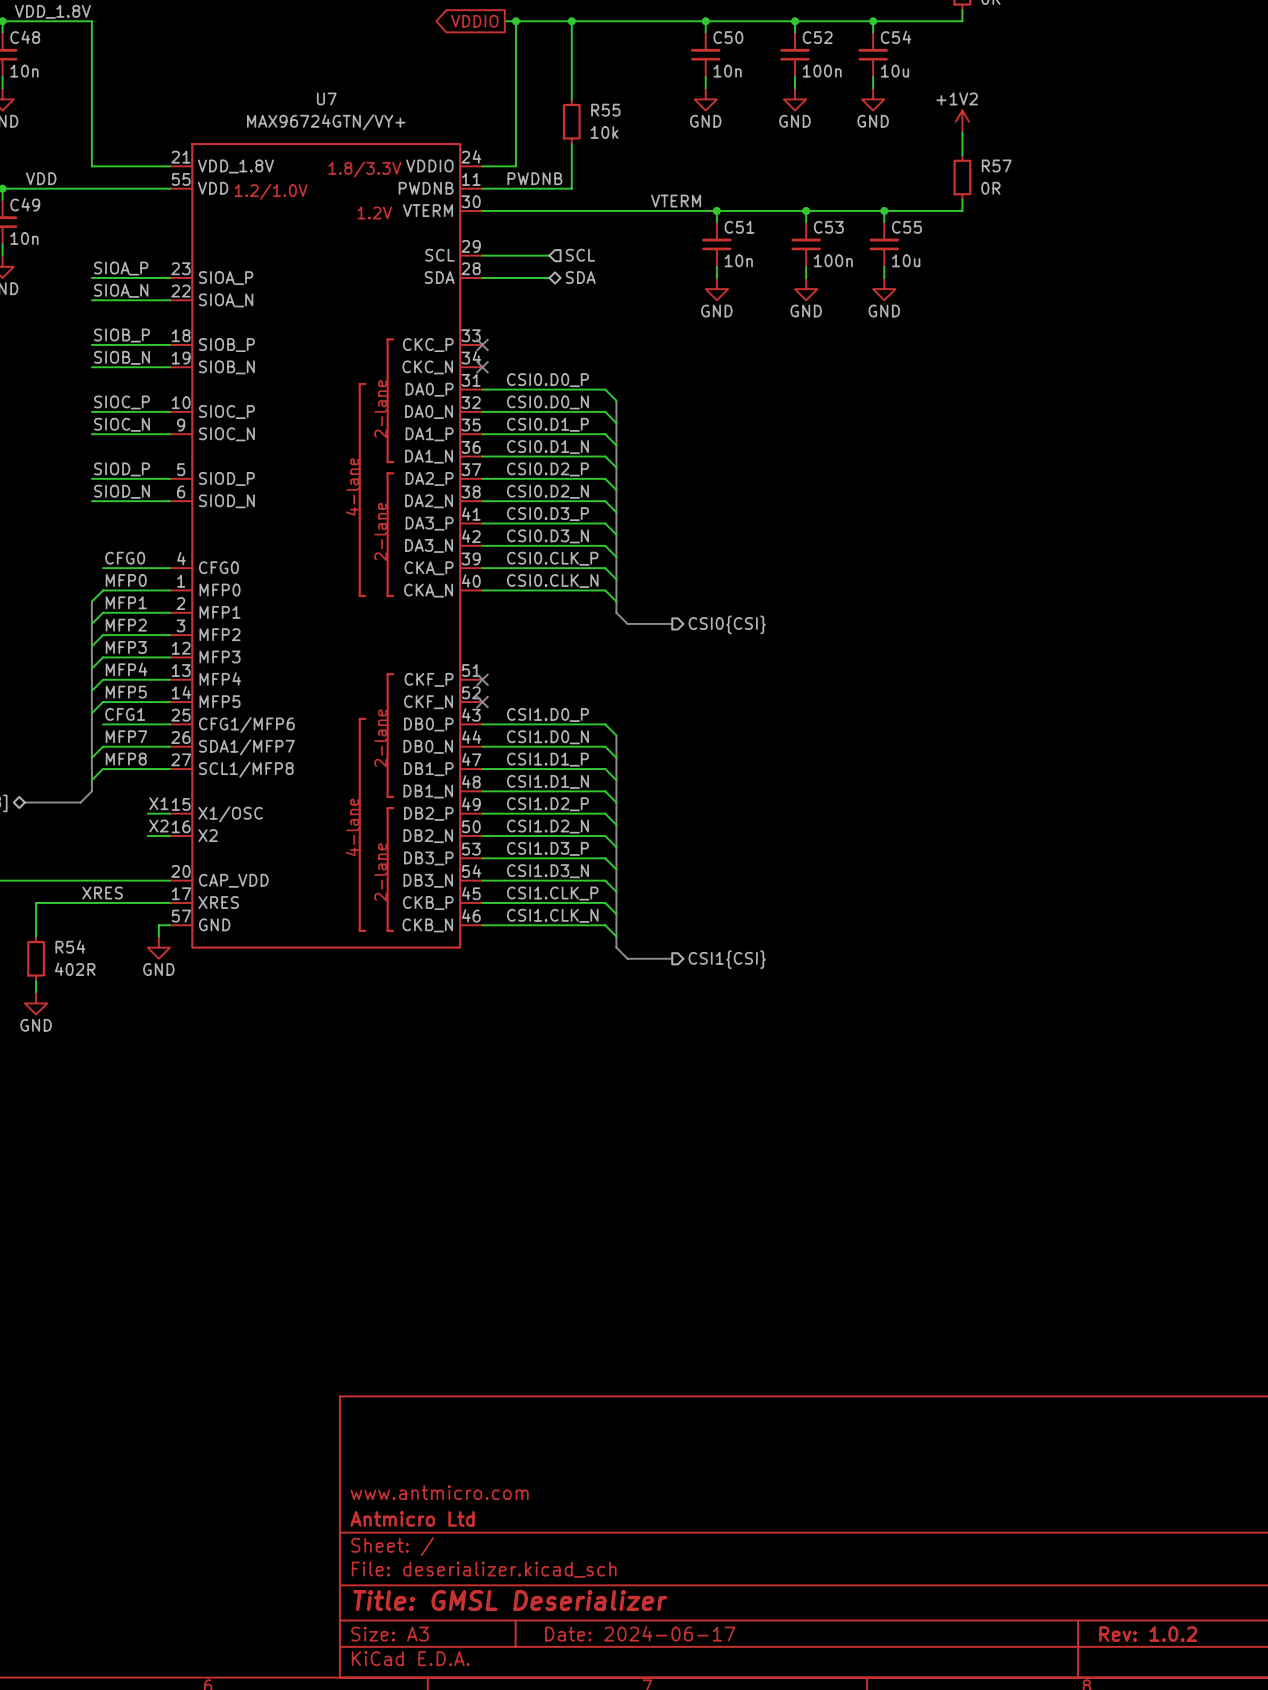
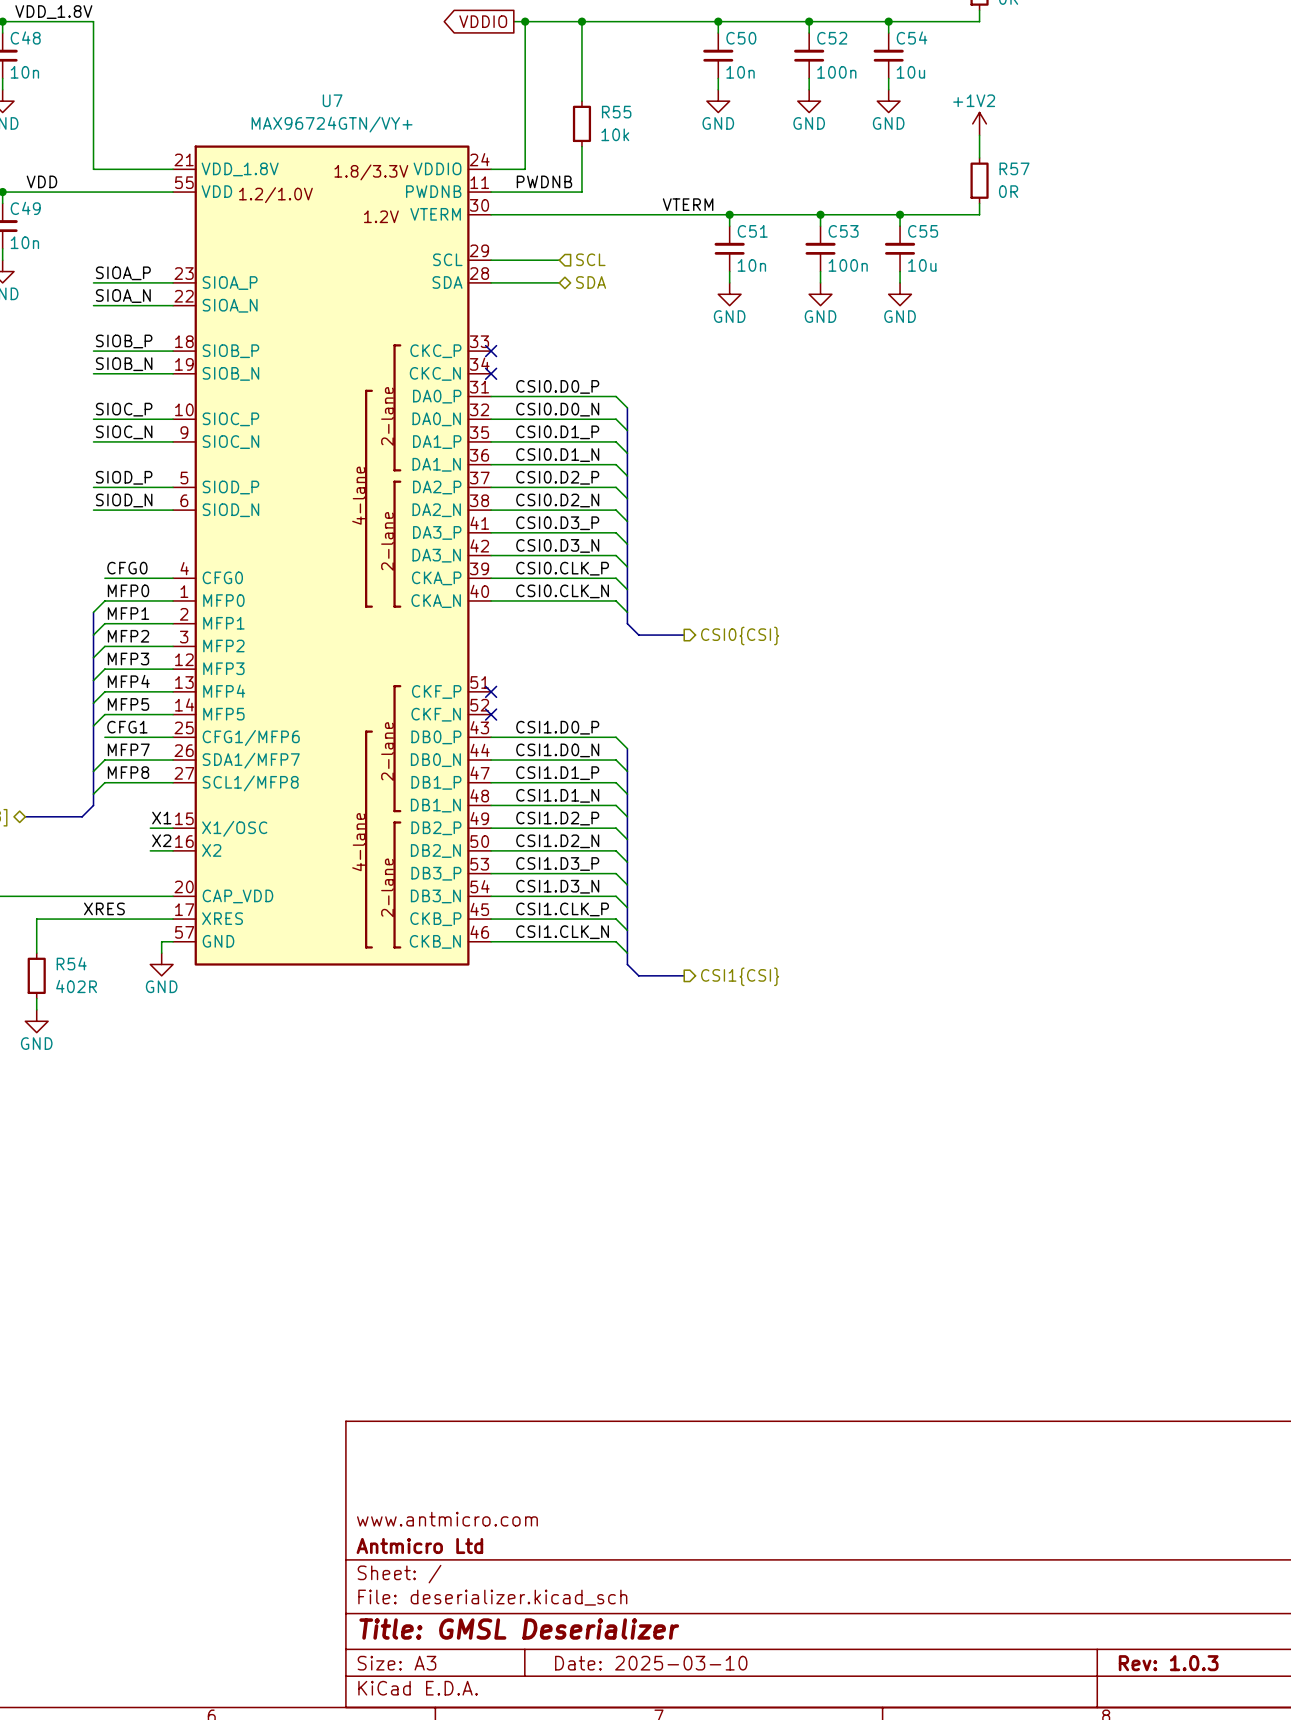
title block: Date: 2024-06-17 (640, 1633) -> Date: 2025-03-10 (651, 1663)
title block: Rev: 1.0.2 (1148, 1634) -> Rev: 1.0.3 (1168, 1663)

